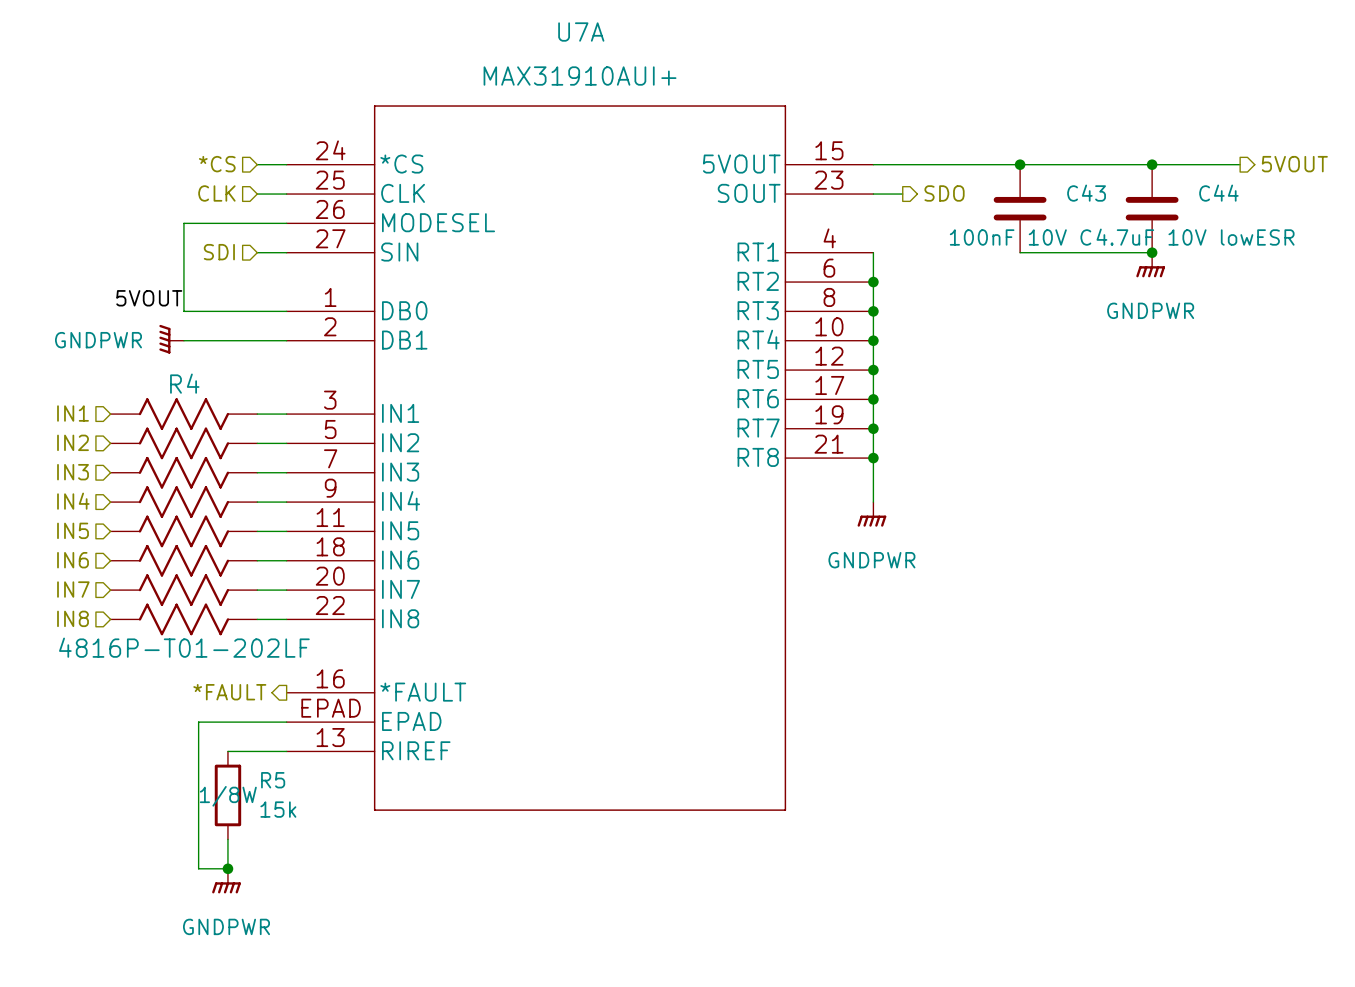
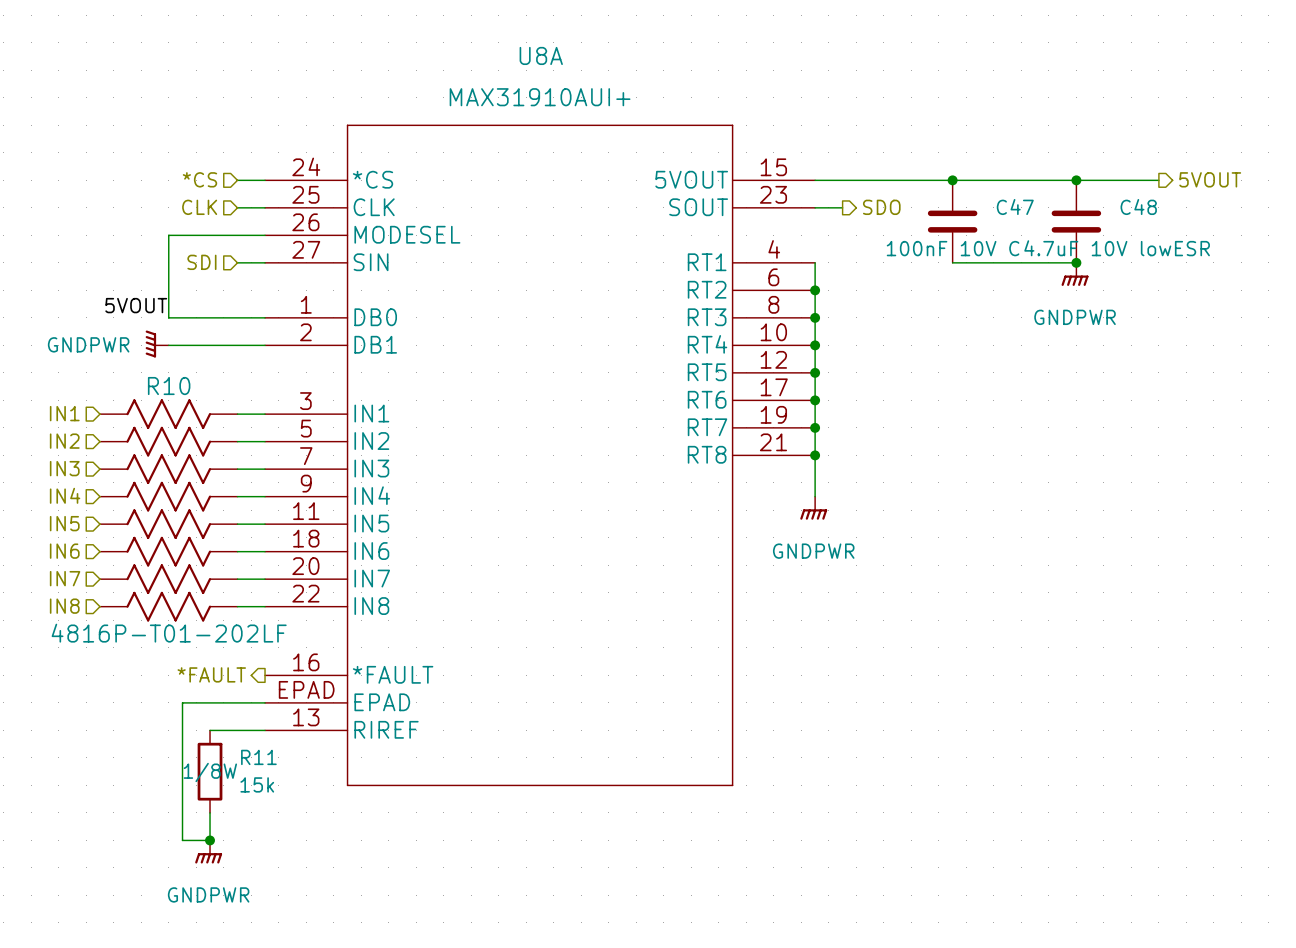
U7A name: U7A (581, 32) -> U8A (541, 55)
C43 name: C43 (1086, 193) -> C47 (1015, 207)
C44 name: C44 (1218, 193) -> C48 (1138, 207)
R4 name: R4 (184, 383) -> R10 (169, 386)
R5 name: R5 (273, 780) -> R11 (258, 757)

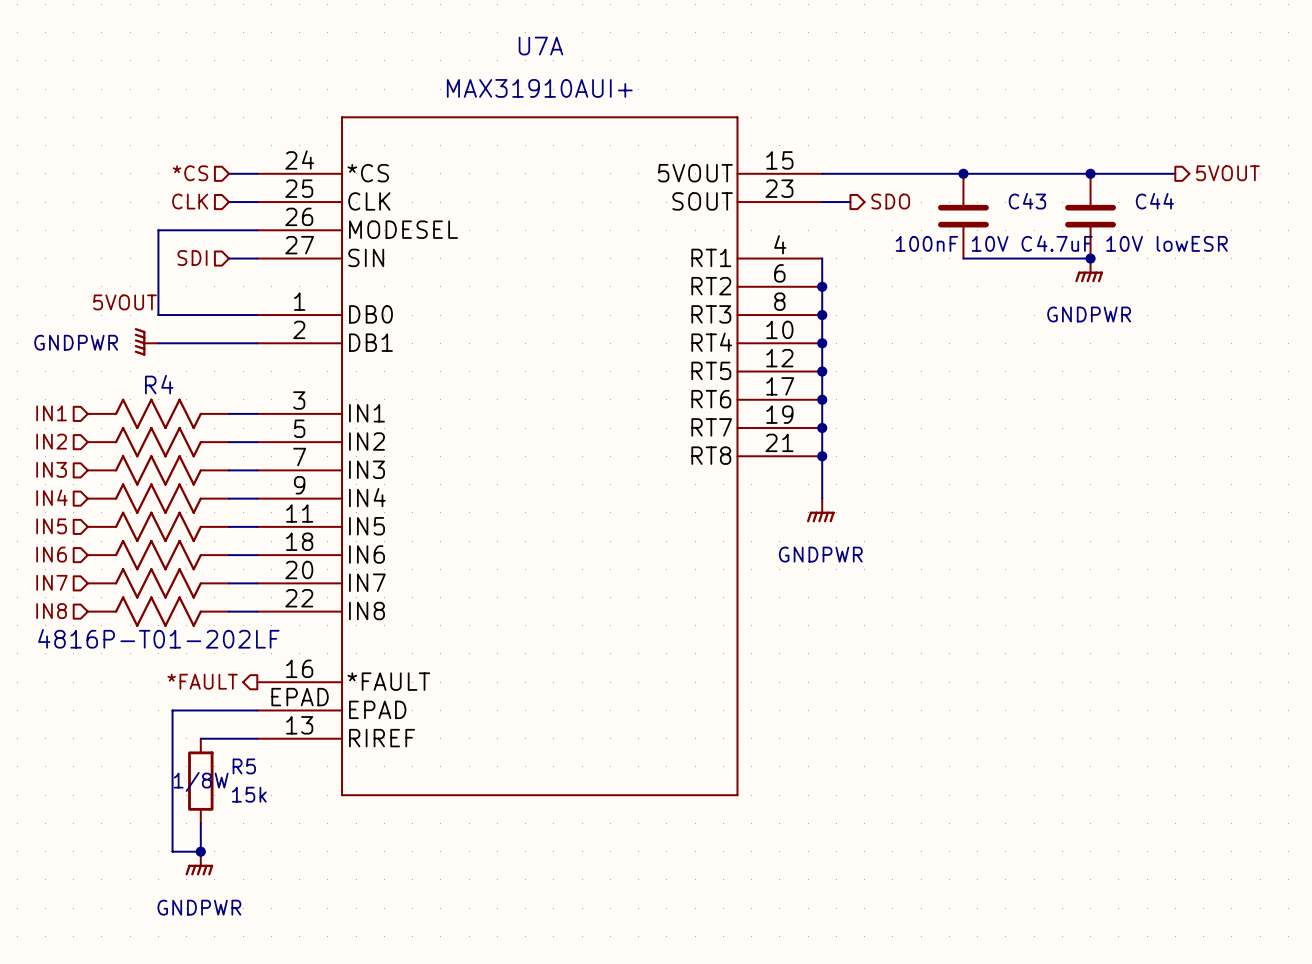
U8A name: U8A (541, 55) -> U7A (540, 46)
C47 name: C47 (1015, 207) -> C43 (1027, 201)
C48 name: C48 (1138, 207) -> C44 (1154, 201)
R10 name: R10 (169, 386) -> R4 (159, 384)
R11 name: R11 (258, 757) -> R5 (244, 766)

